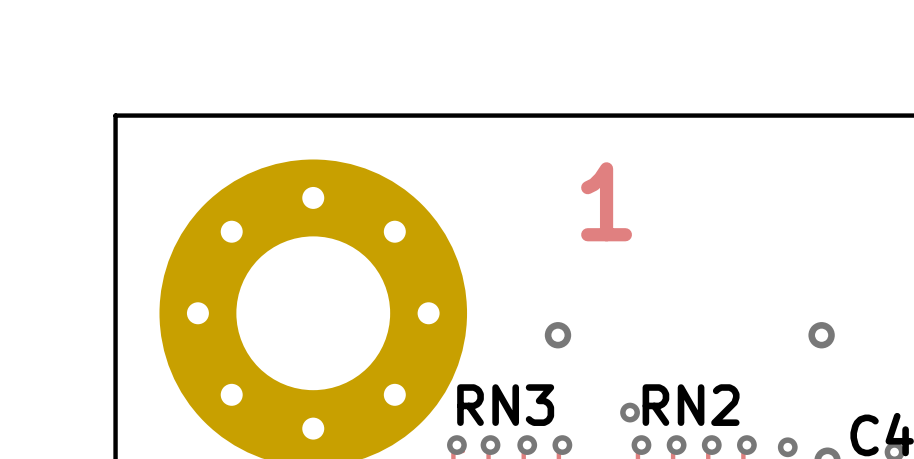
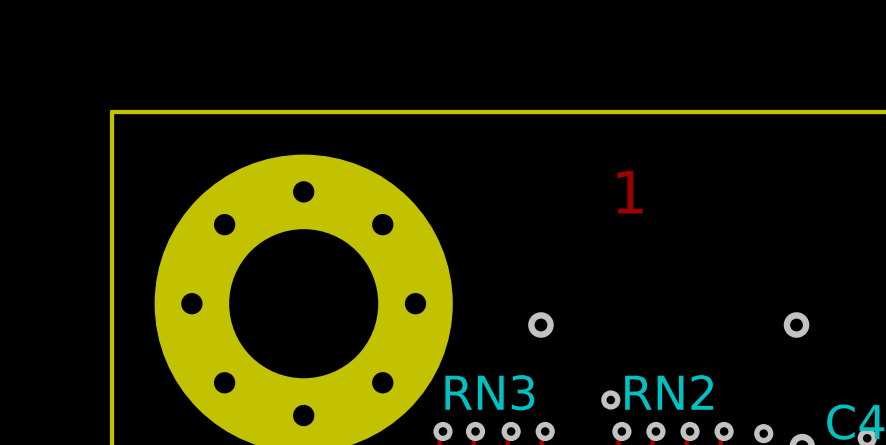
drawing: none -> [617, 170, 643, 214]
text: 1 (606, 201) -> none

